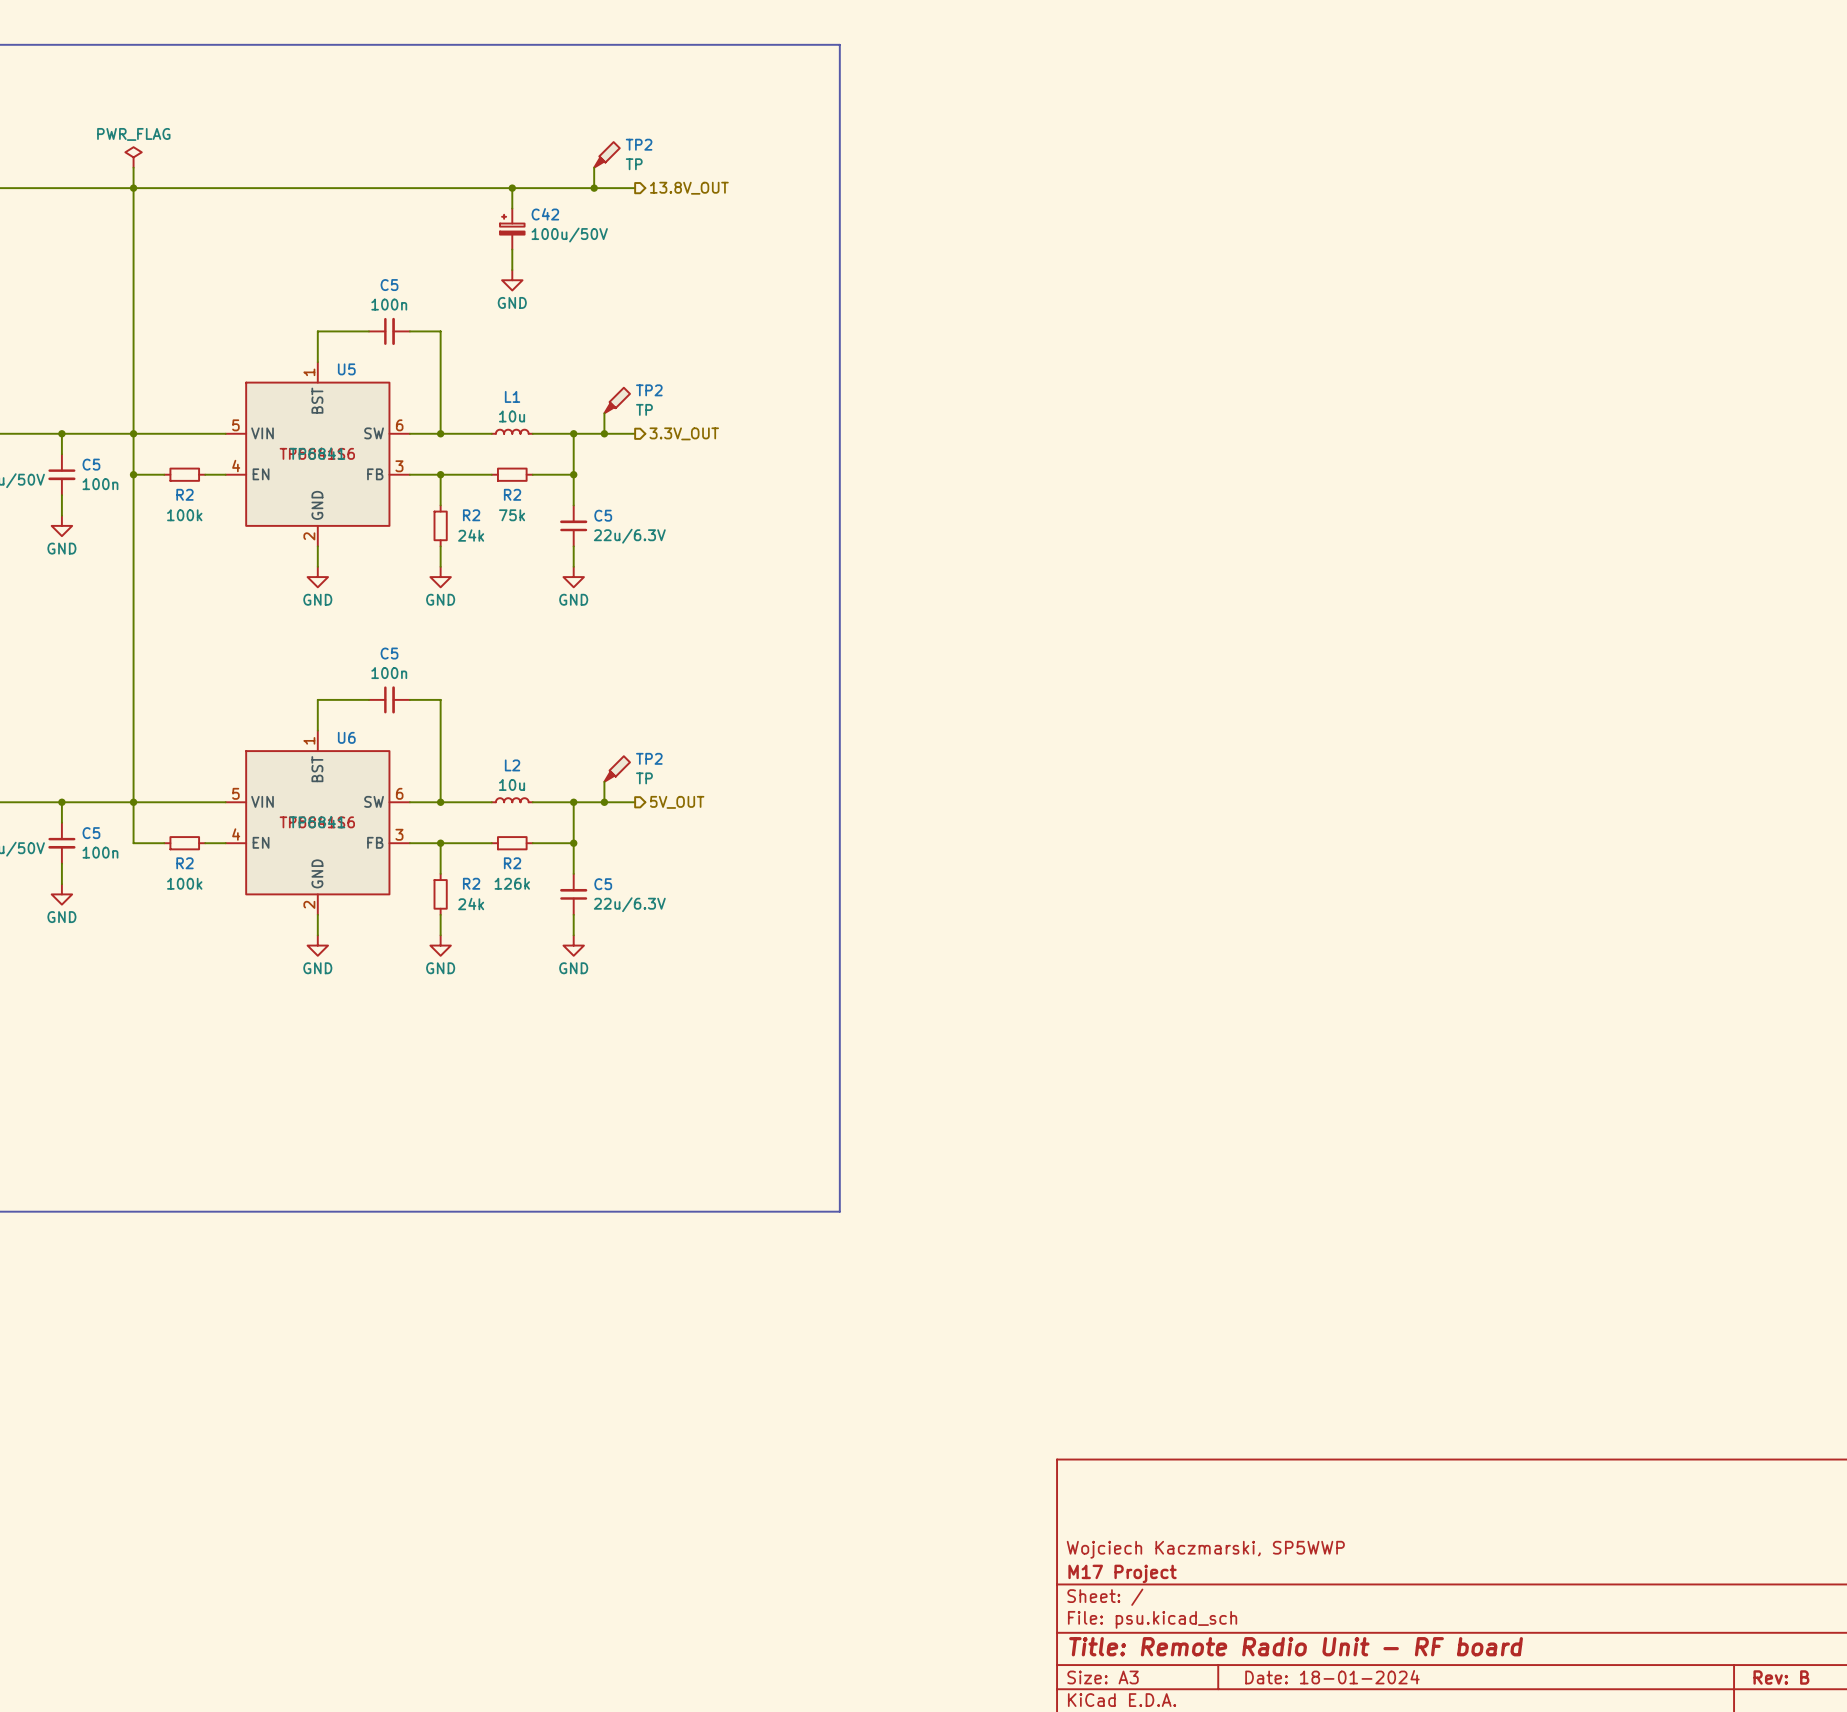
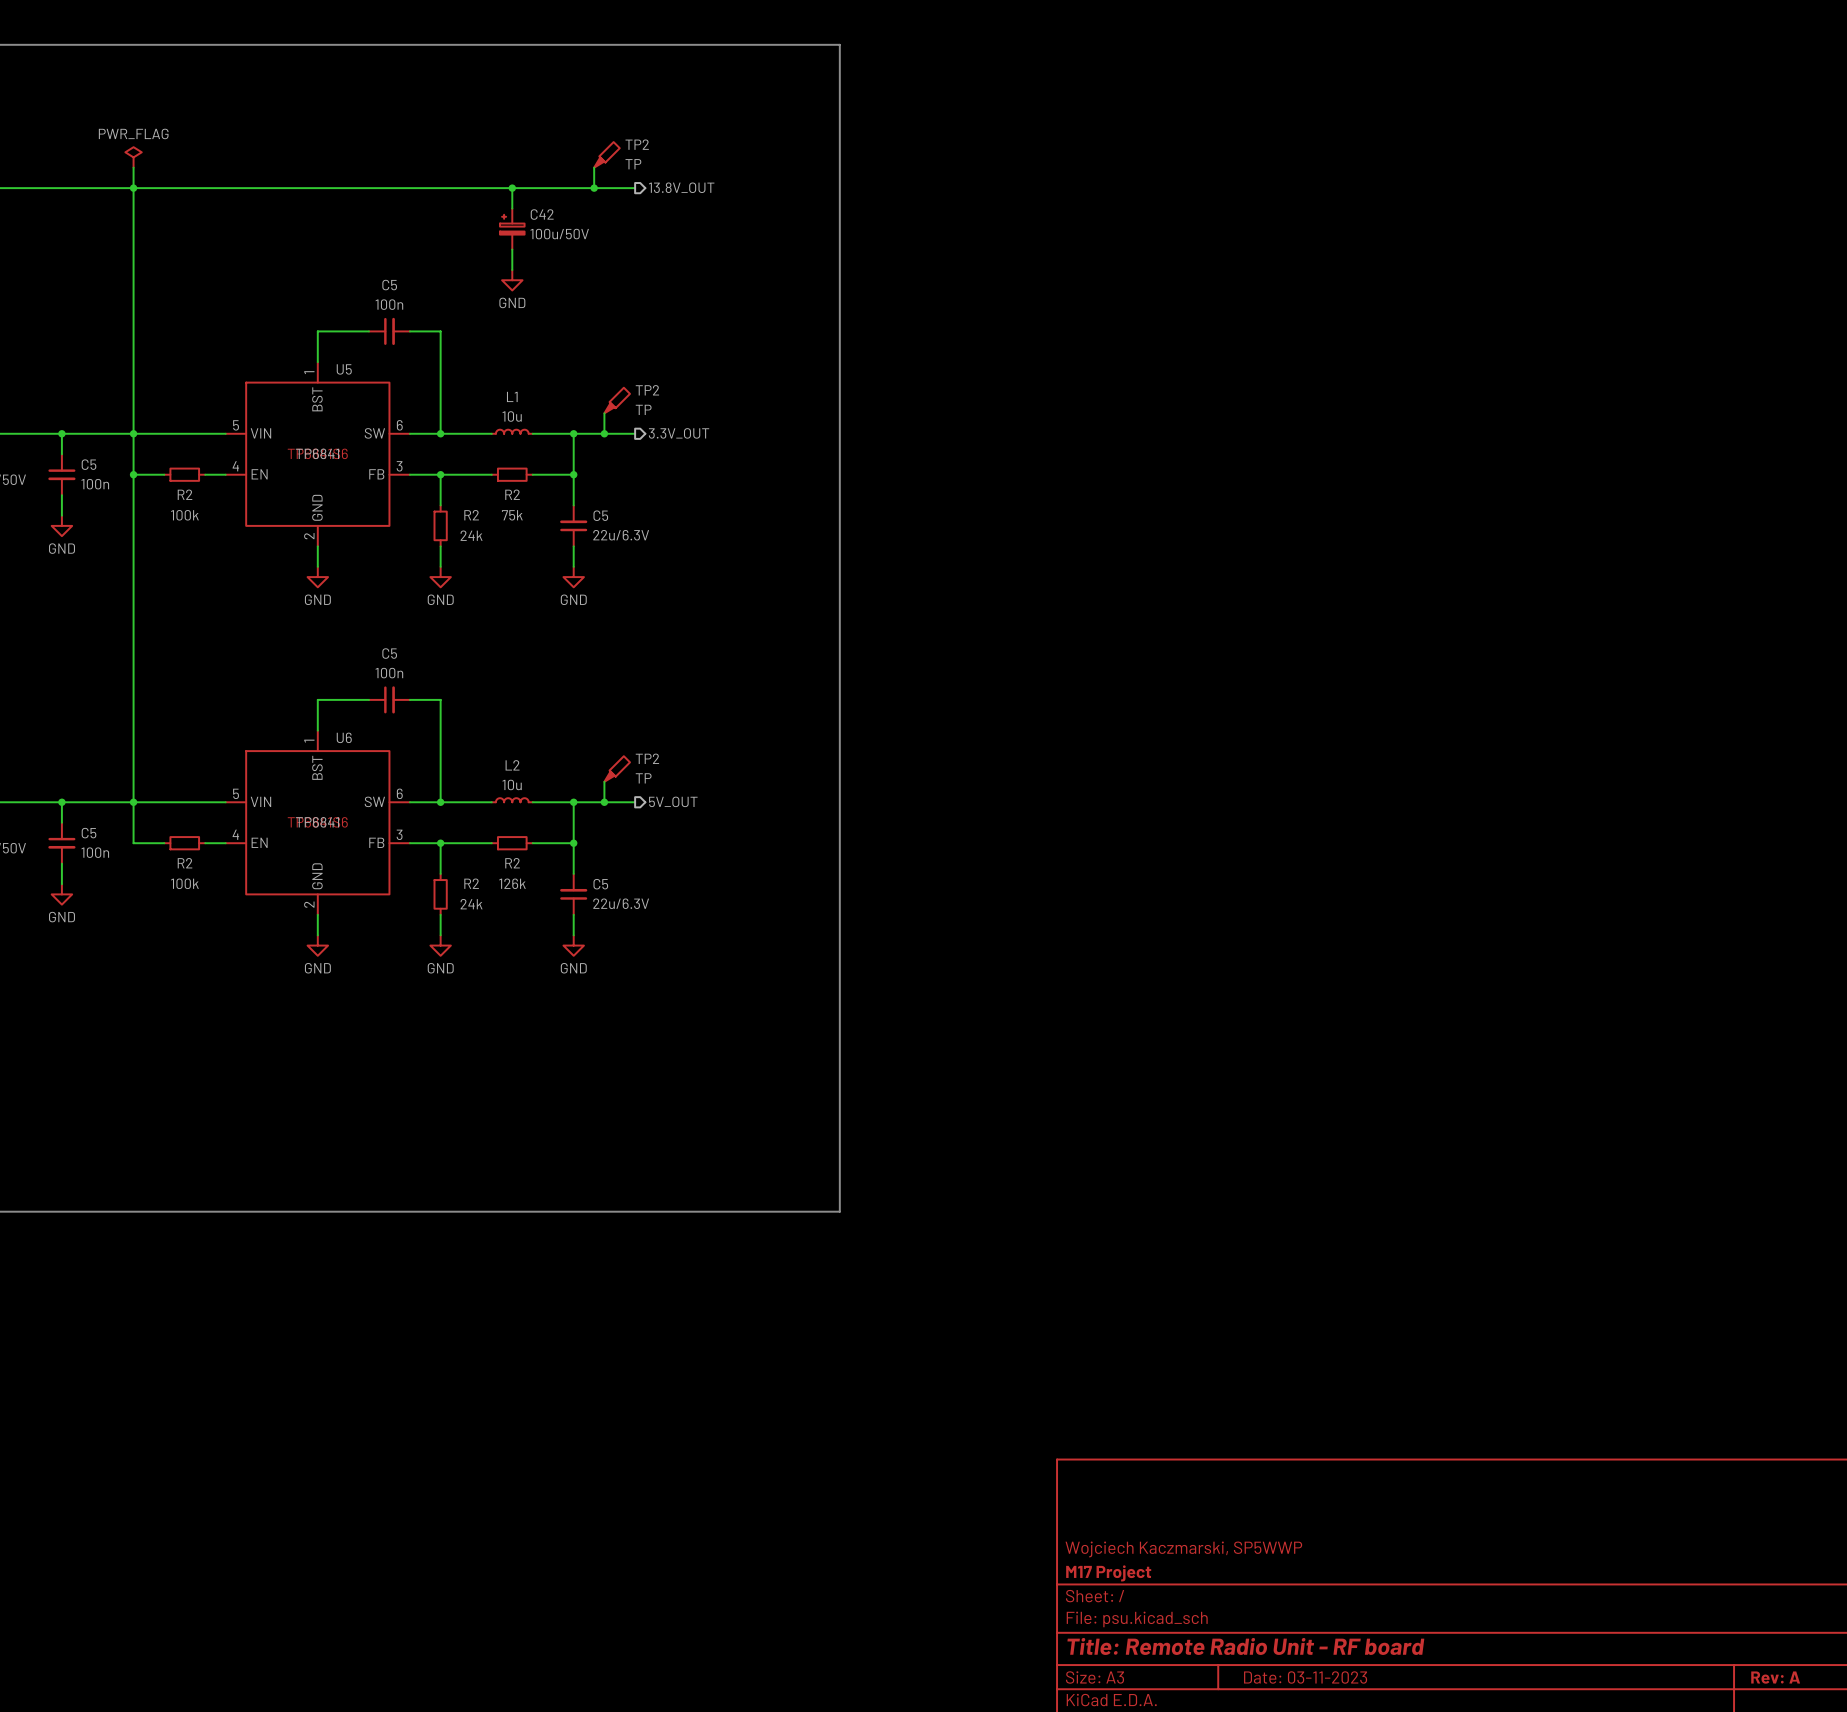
title block: Date: 18-01-2024 (1332, 1677) -> Date: 03-11-2023 (1305, 1677)
title block: Rev: B (1781, 1677) -> Rev: A (1775, 1677)

